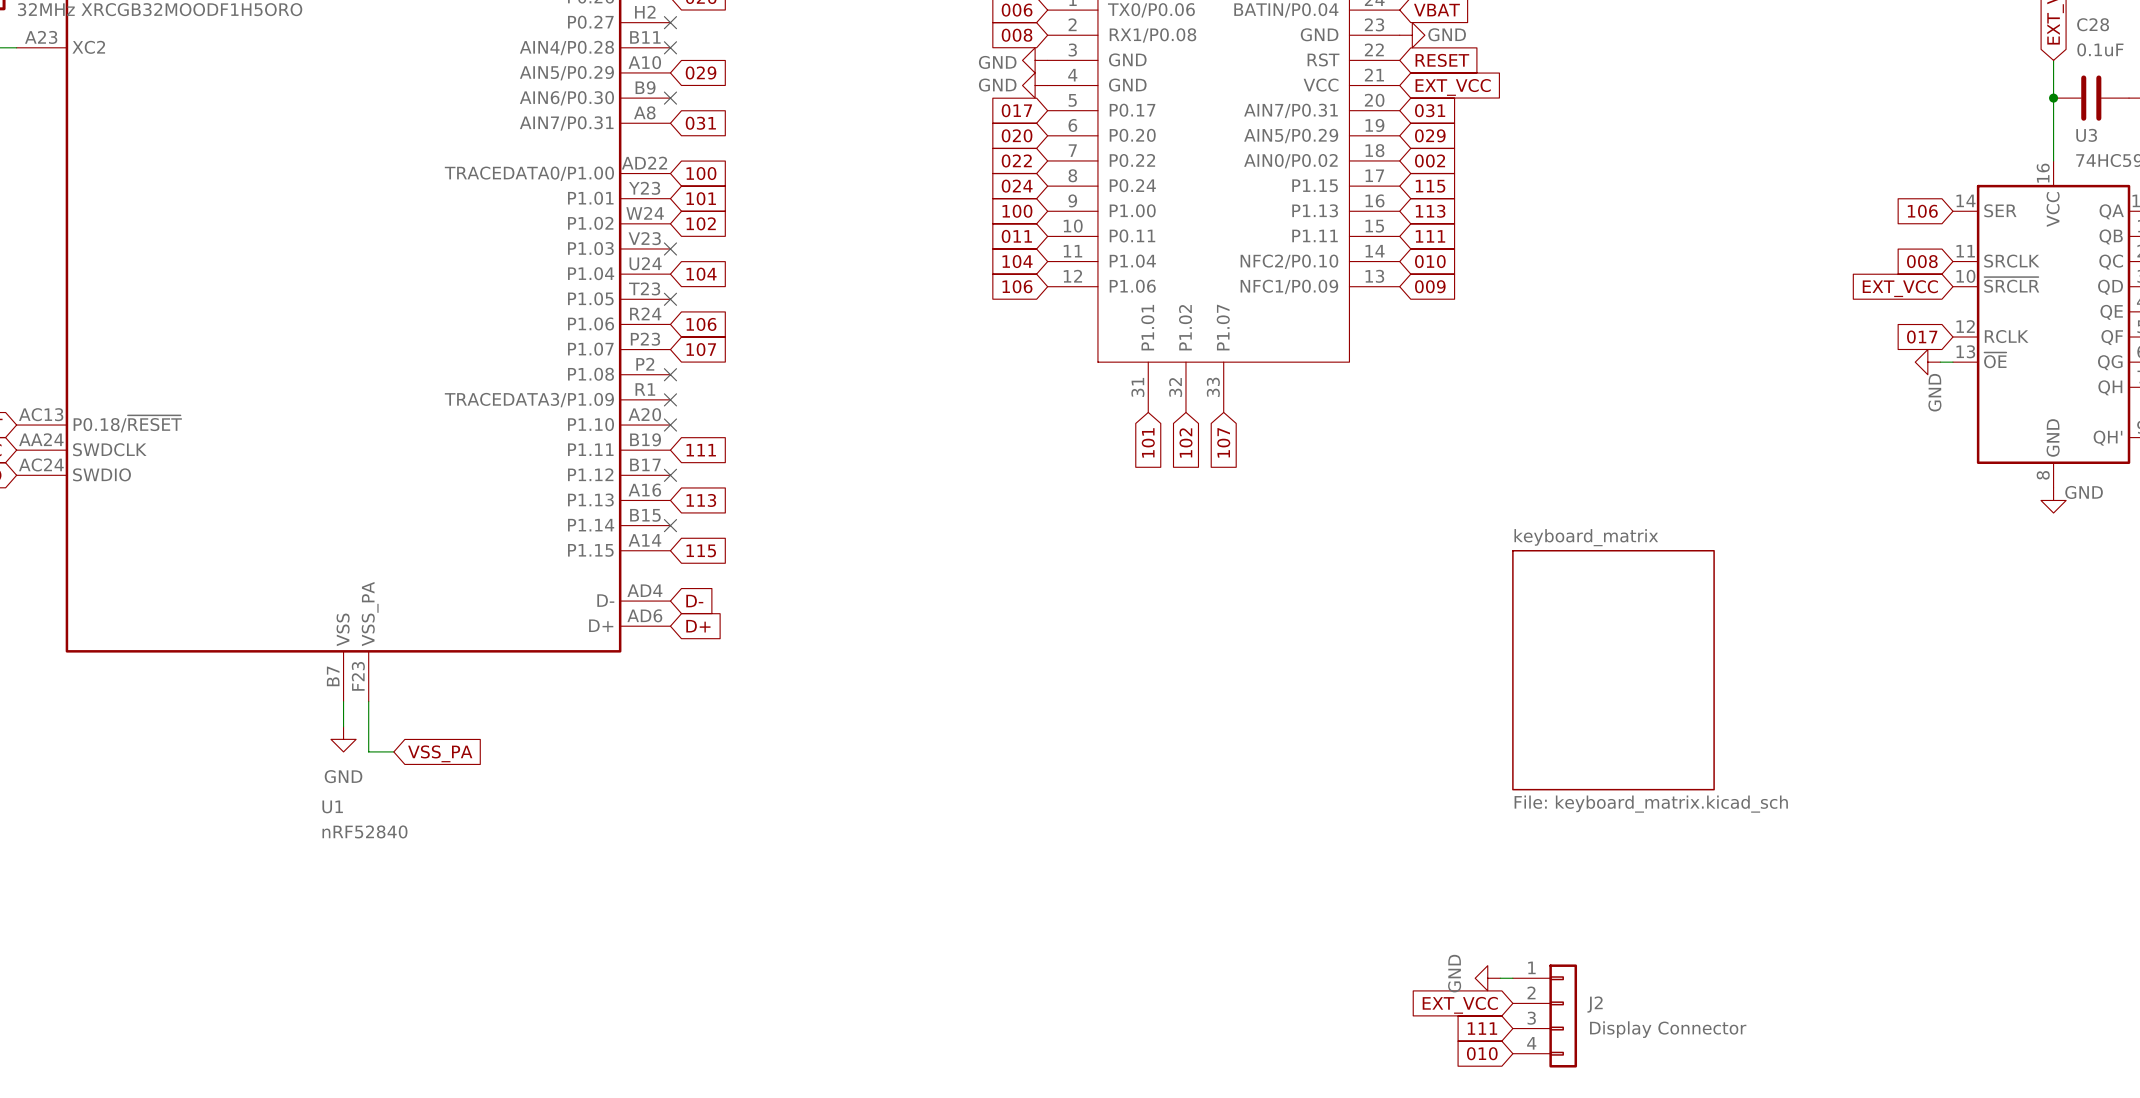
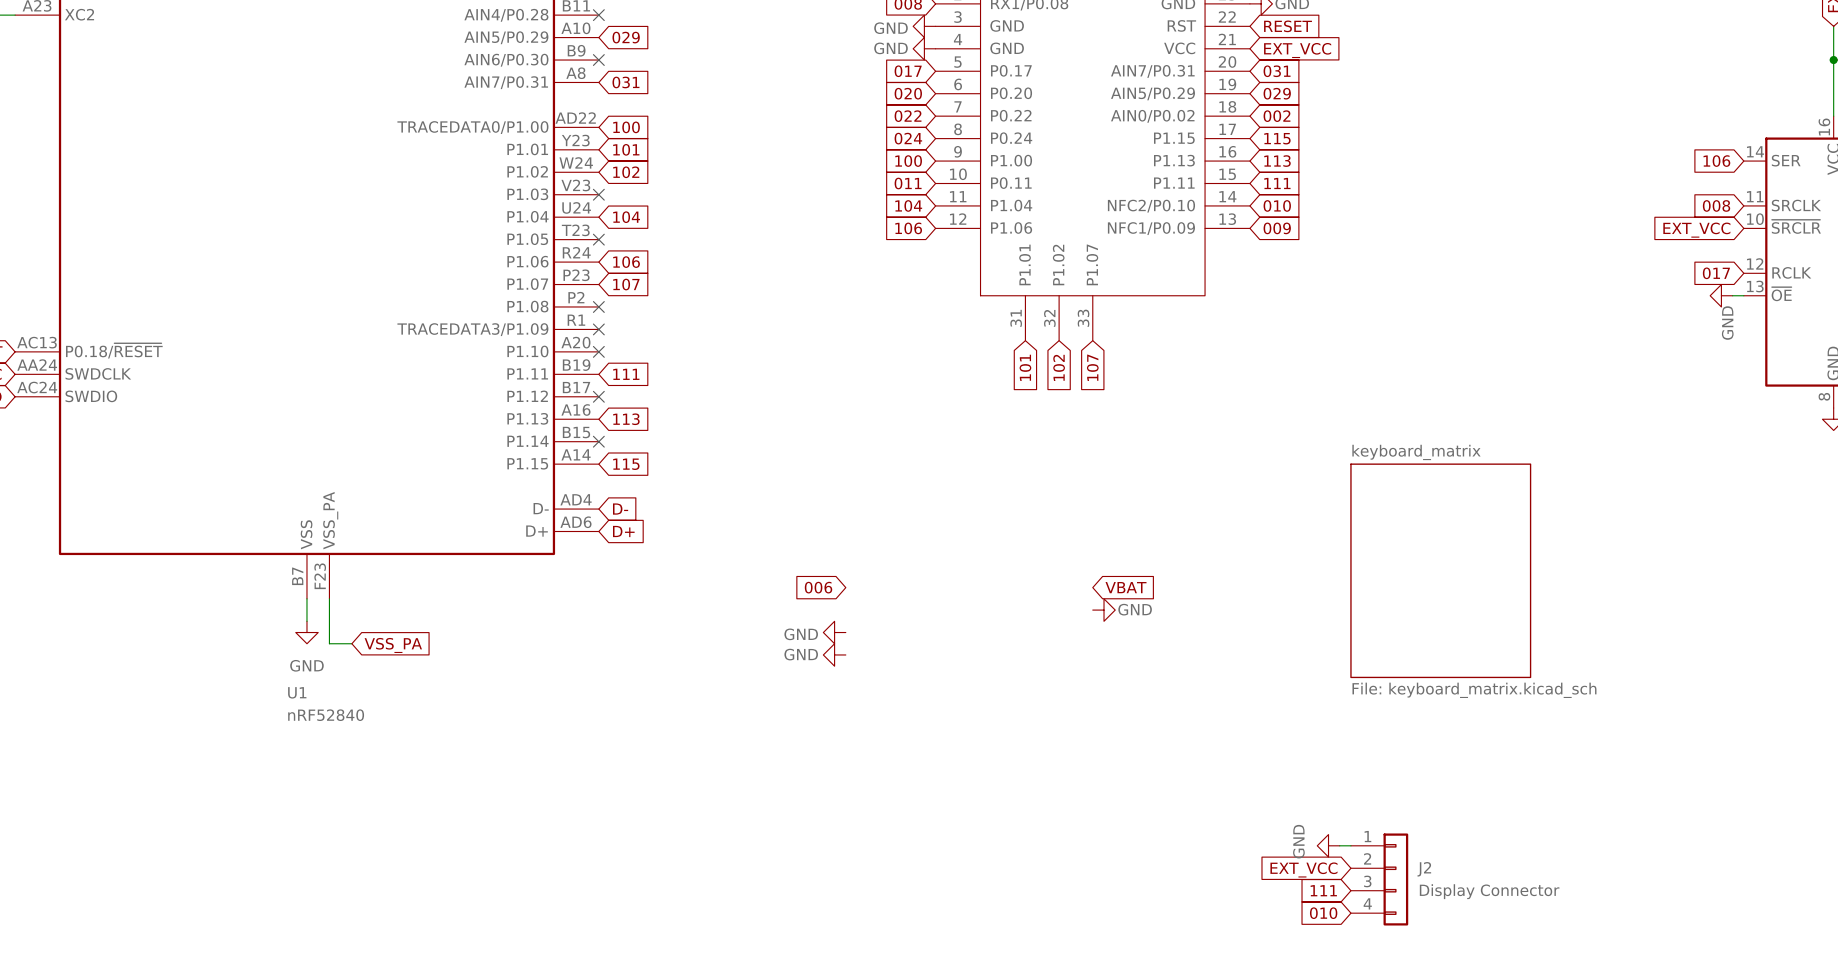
global label: none -> 006 (818, 587)
global label: none -> VBAT (1126, 587)
power symbol: none -> GND (1104, 610)
power symbol: none -> GND (834, 632)
power symbol: none -> GND (834, 654)

